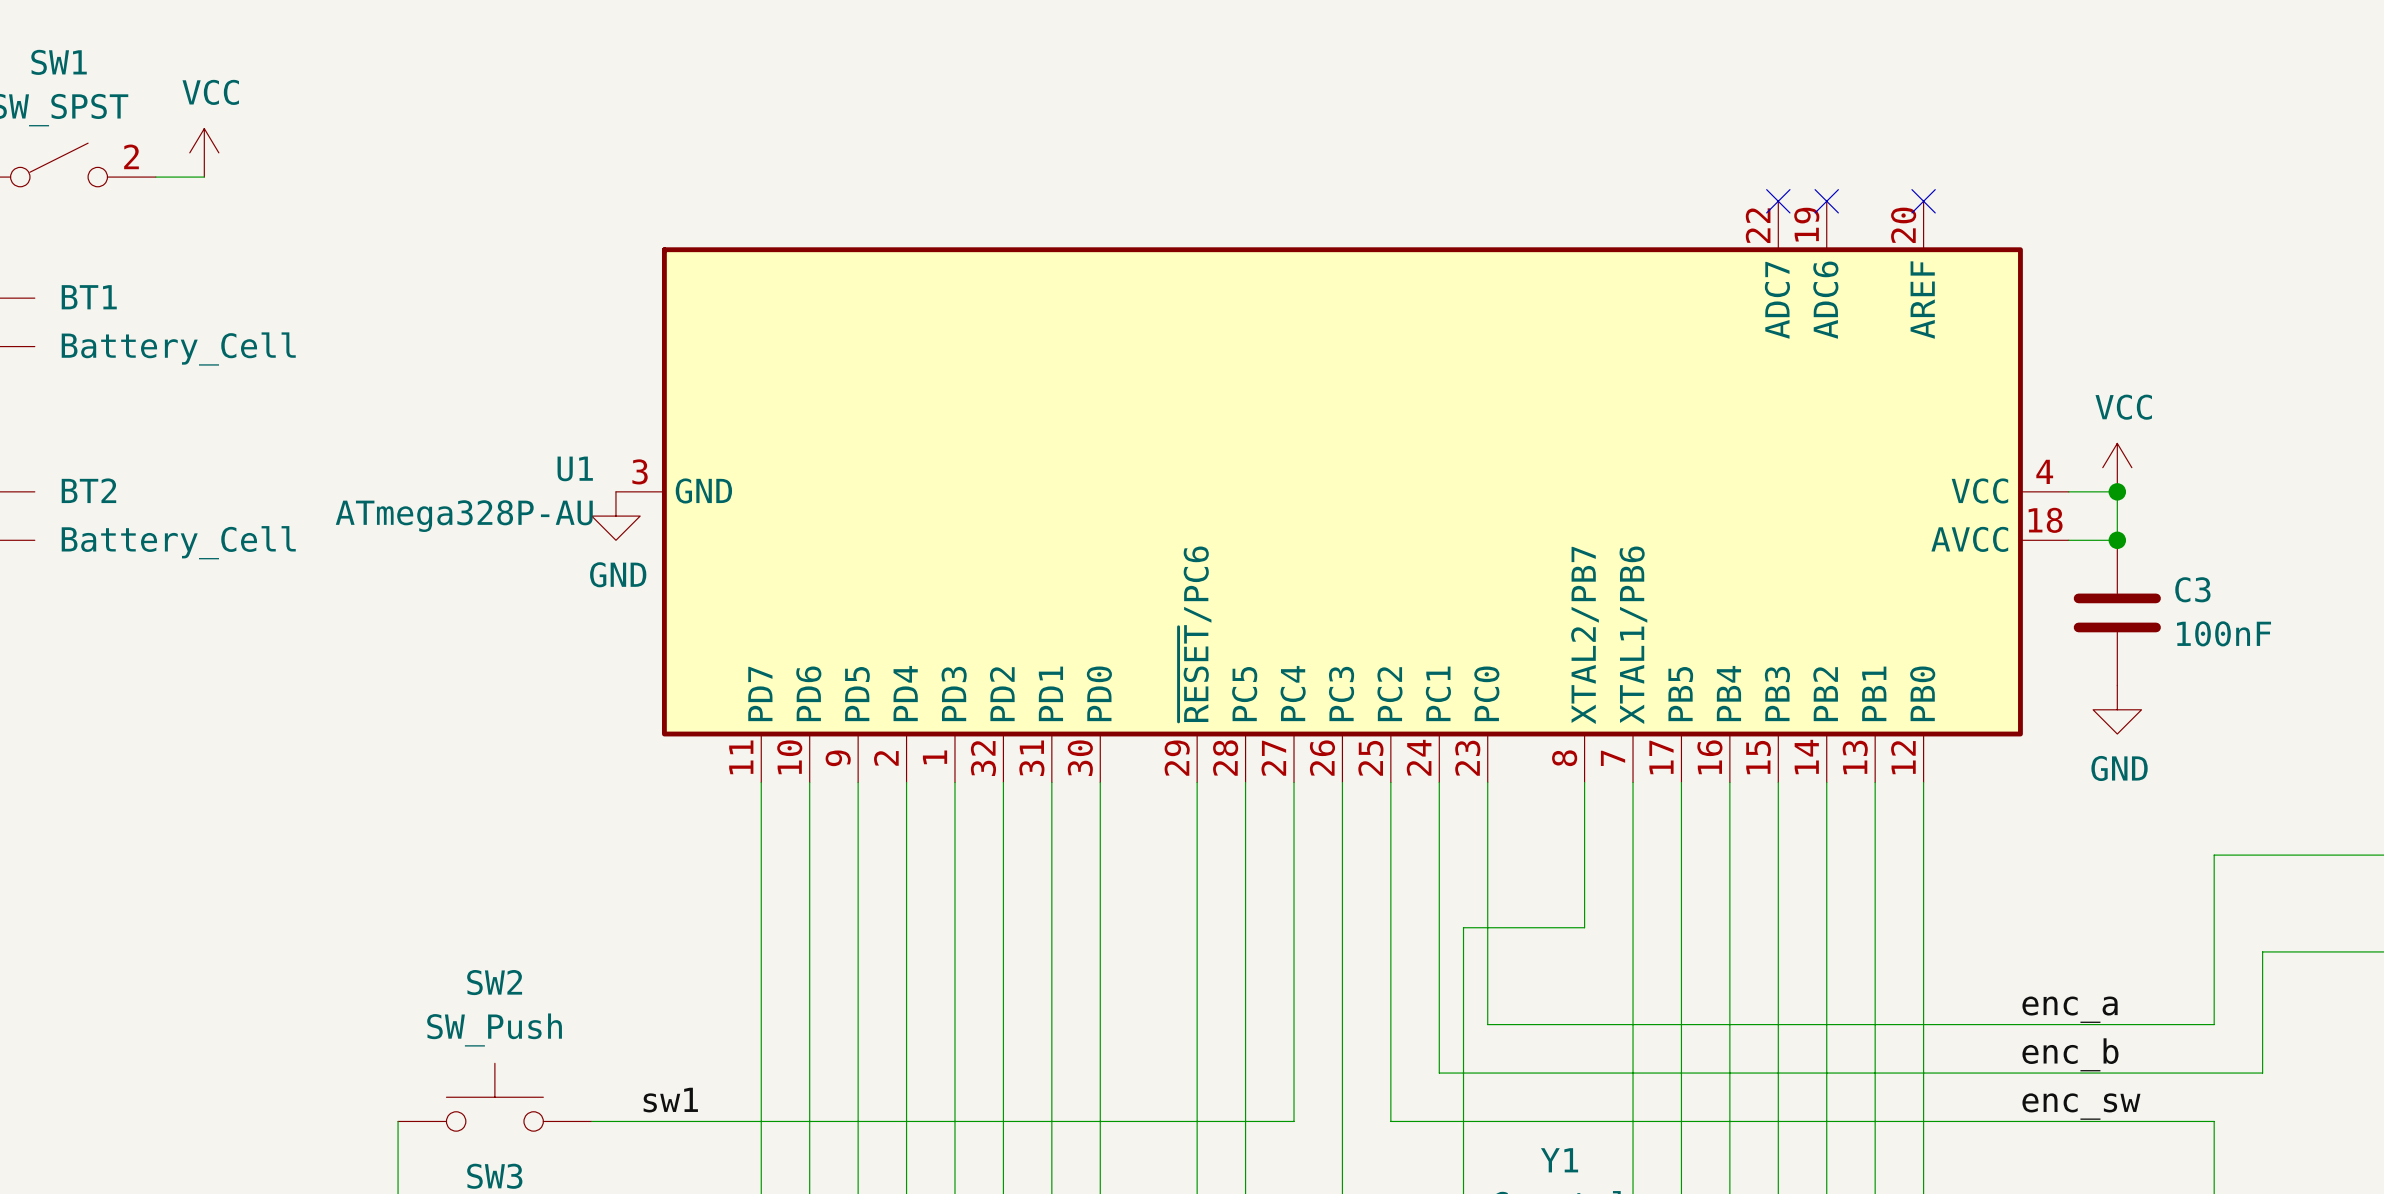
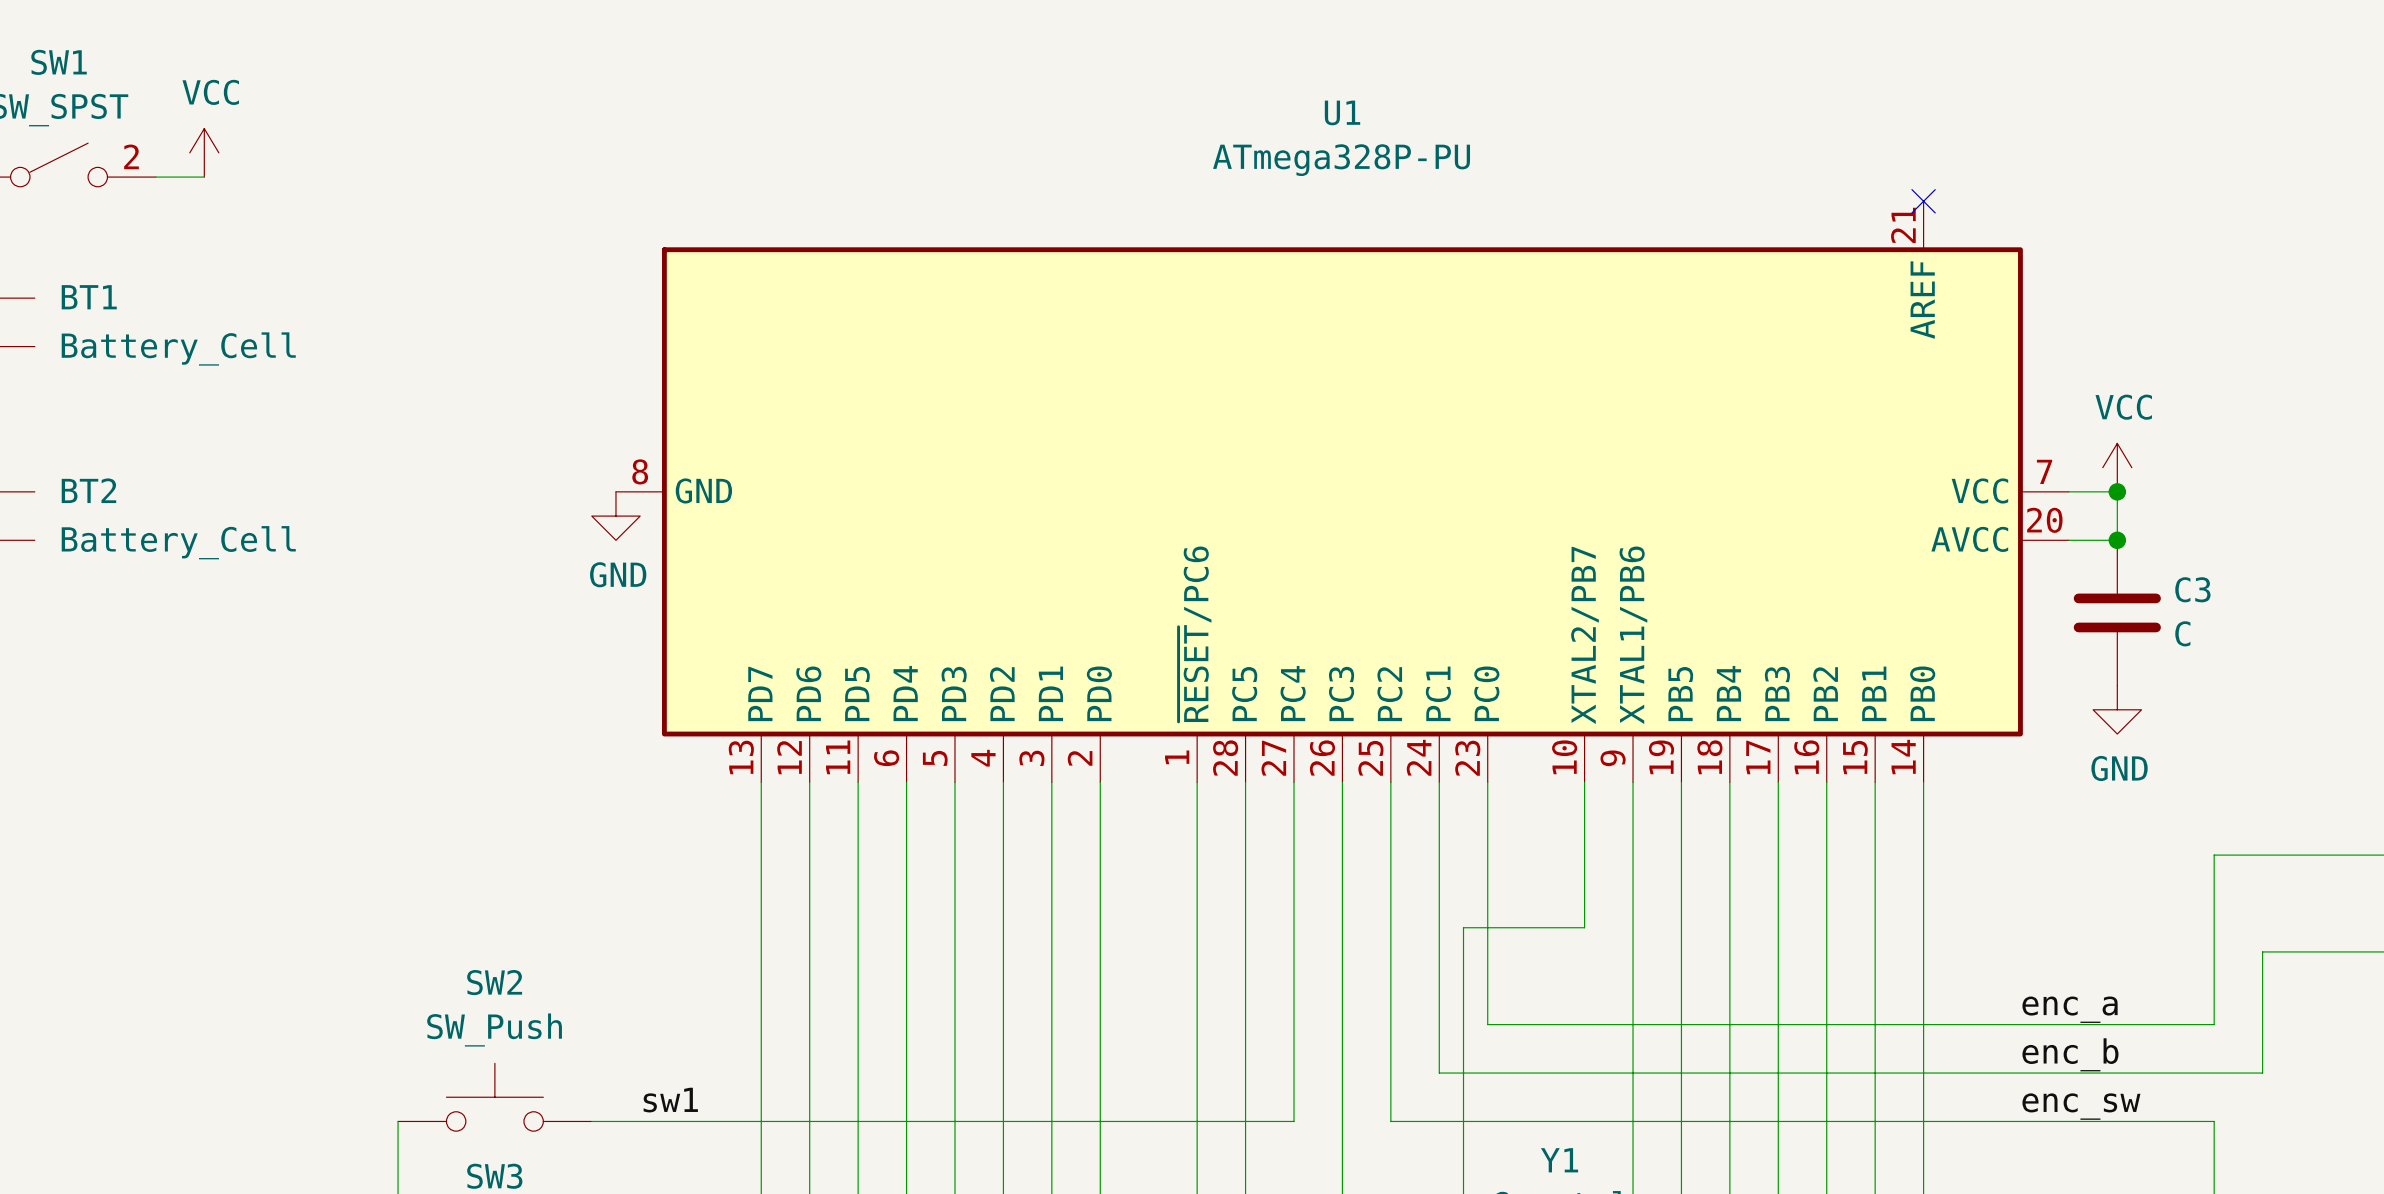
U1 symbol: [615, 201, 2069, 783] -> [615, 201, 2069, 783]
no-connect mark: (1778, 201) -> none
no-connect mark: (1826, 201) -> none
U1 name position: U1 (575, 468) -> U1 (1342, 112)
U1 value: ATmega328P-AU (464, 516) -> ATmega328P-PU (1341, 160)
C3 value: 100nF (2224, 633) -> C (2182, 633)

